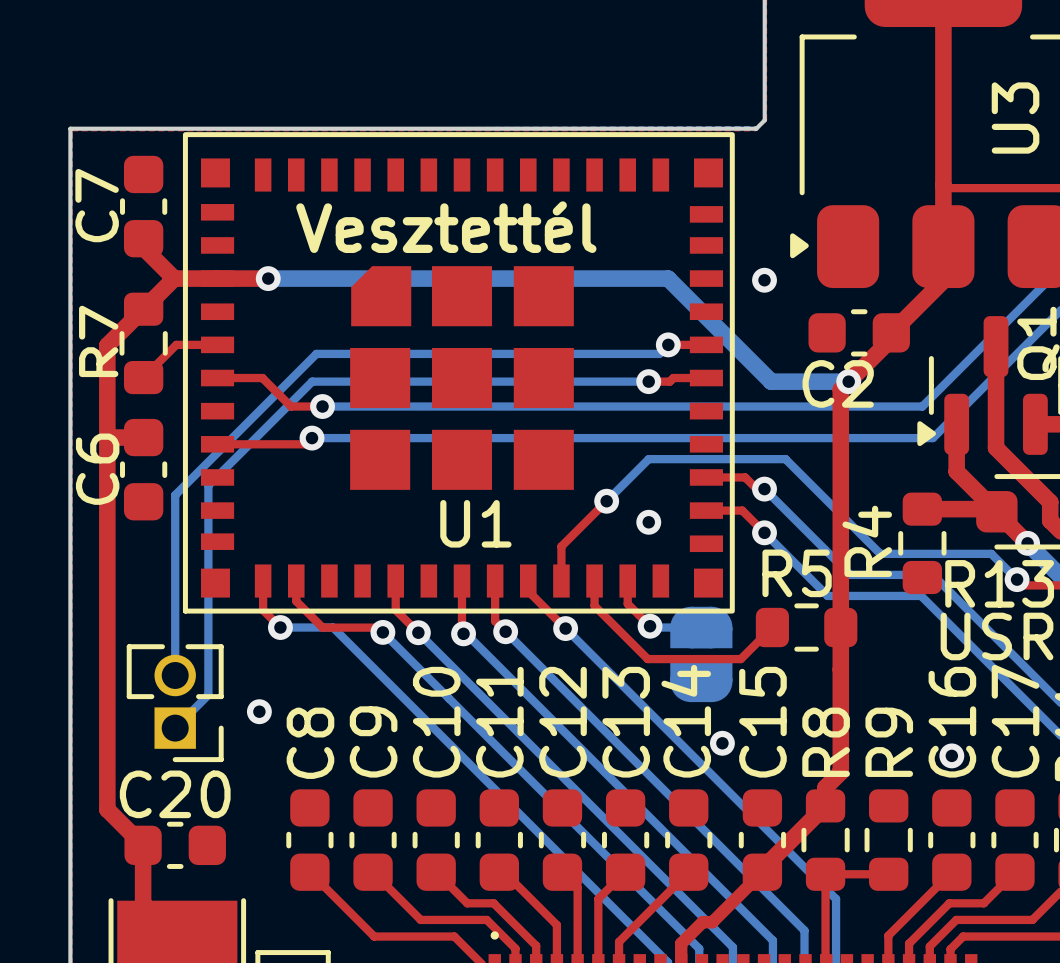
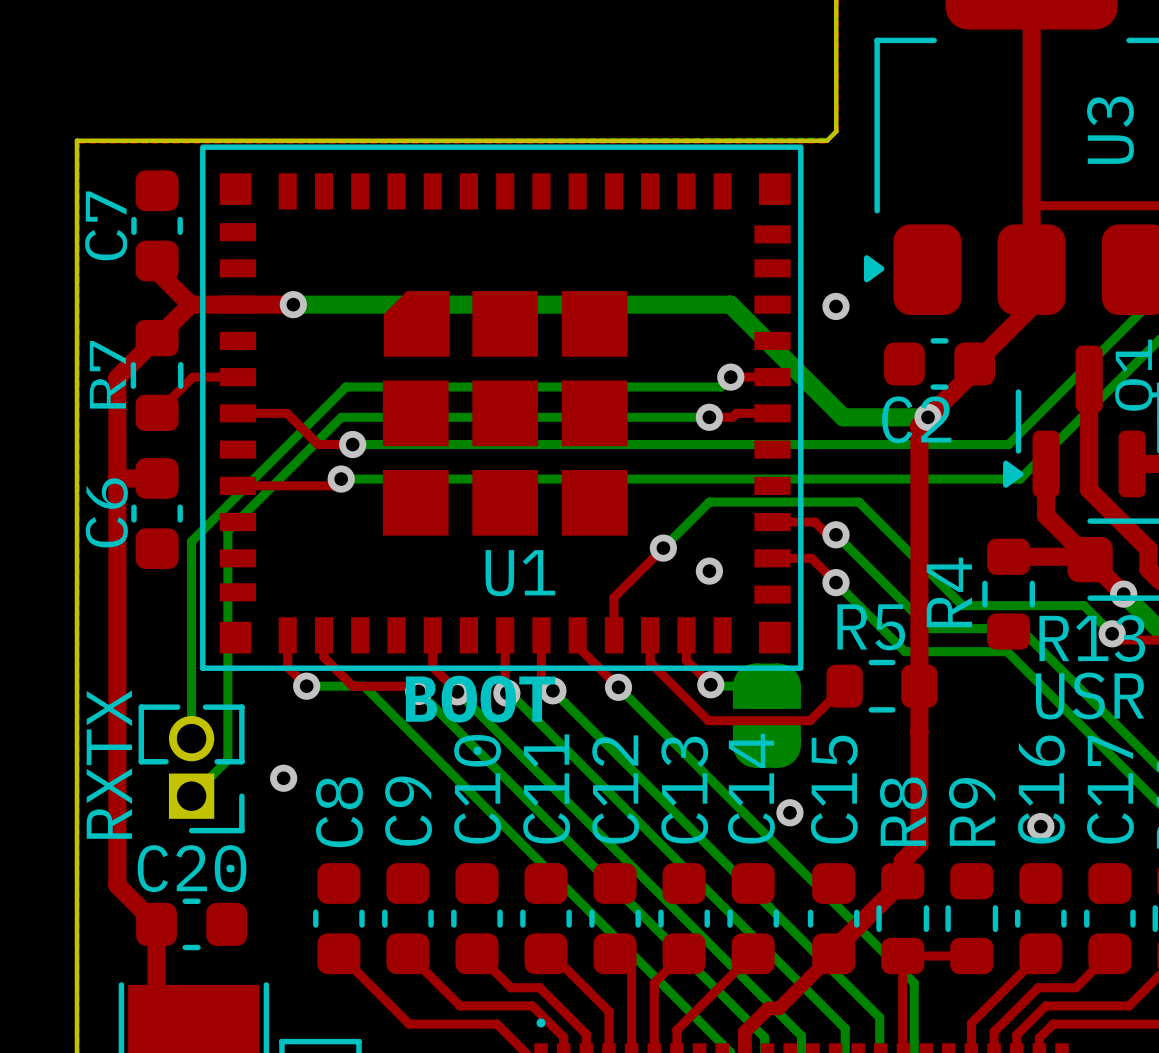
text: Vesztettél (446, 227) -> none
text: none -> BOOT (480, 699)
text: none -> RXTX (109, 764)

